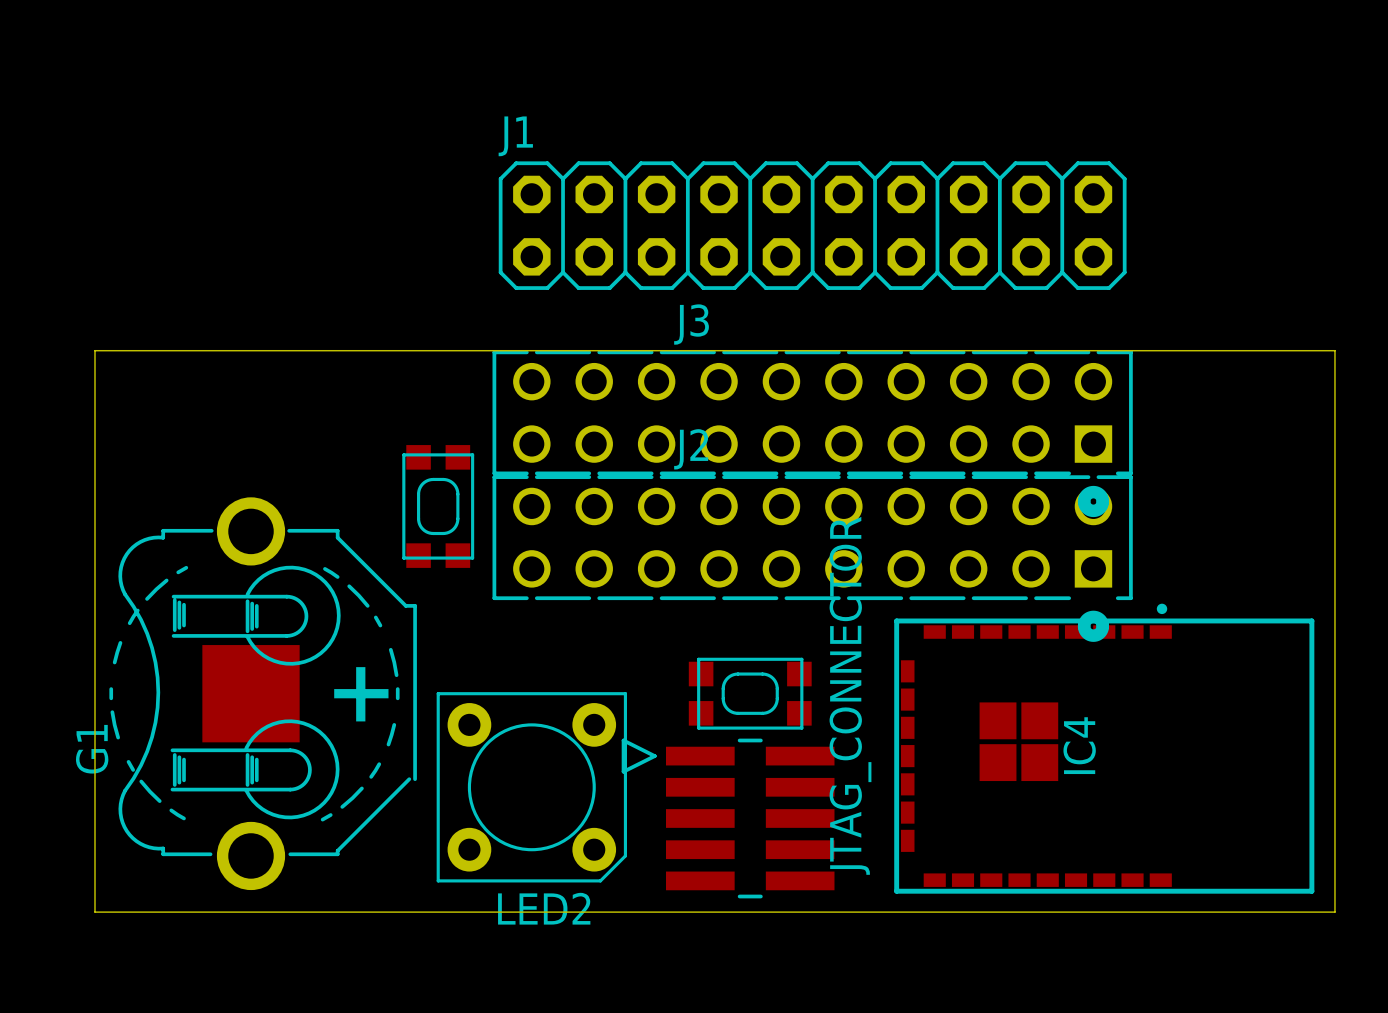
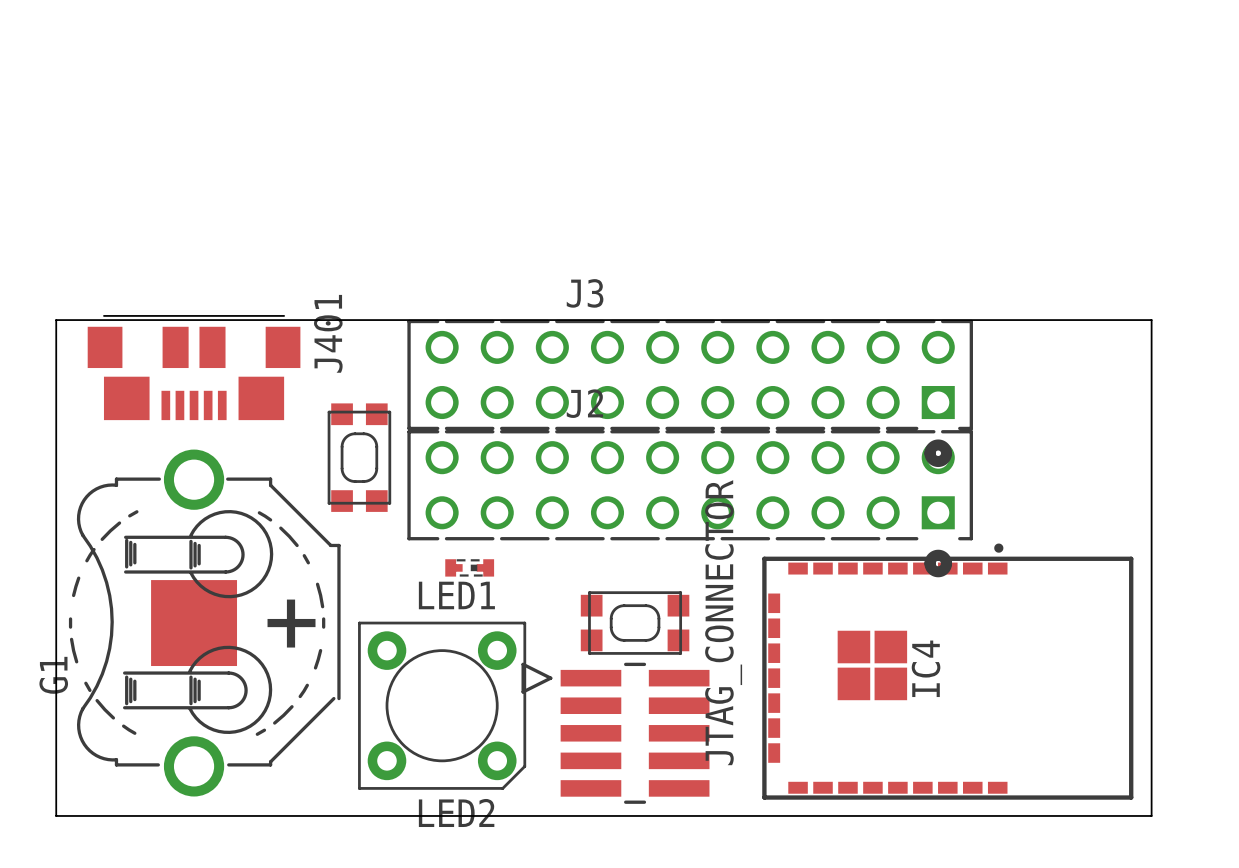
J1: (812, 225) -> none
J401: none -> (194, 368)
LED1: none -> (469, 567)

